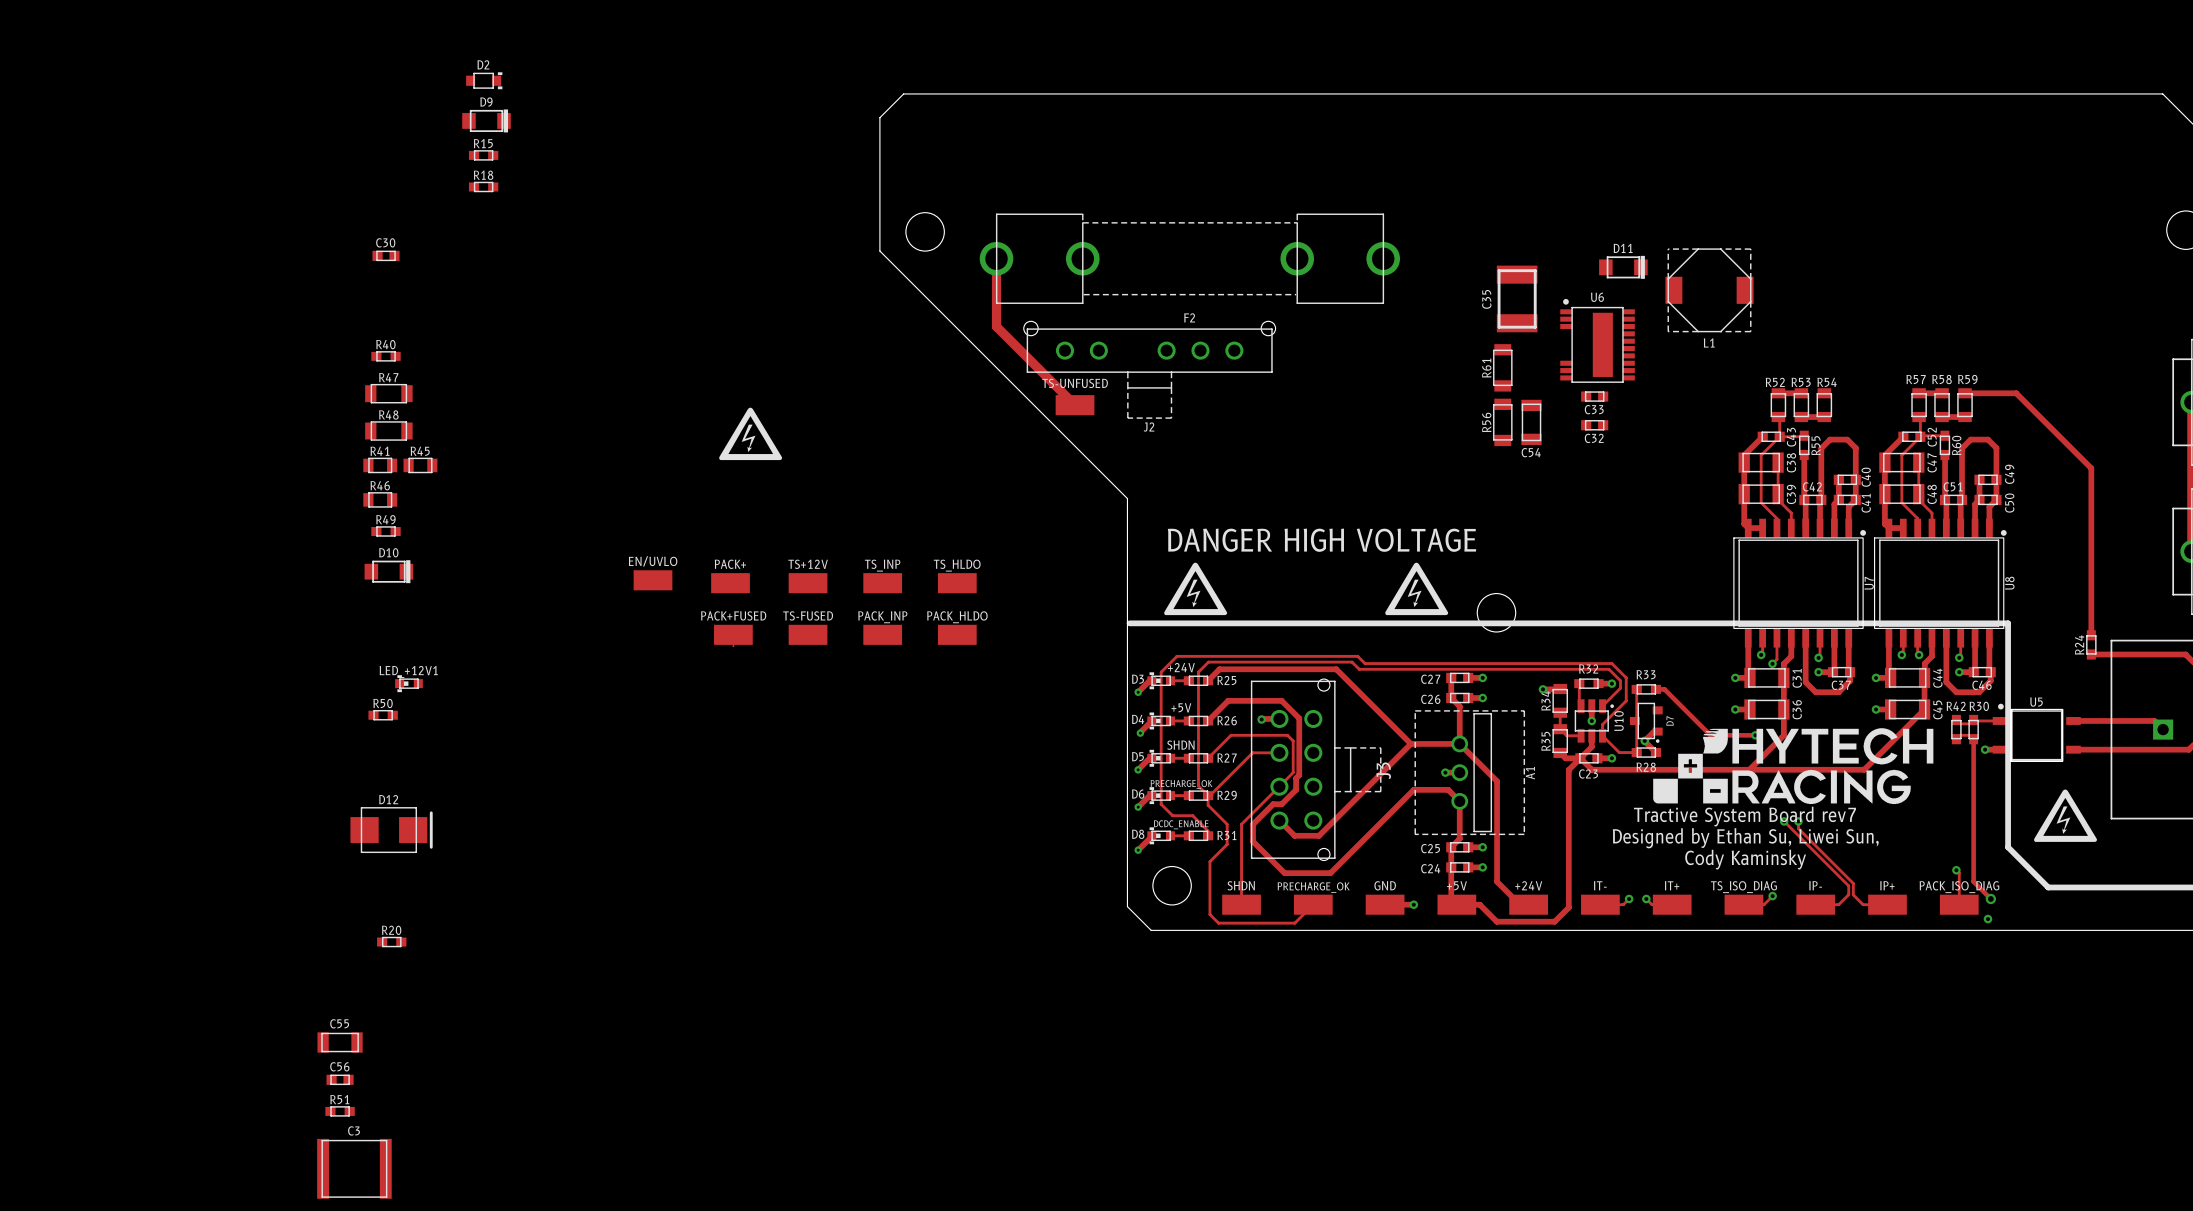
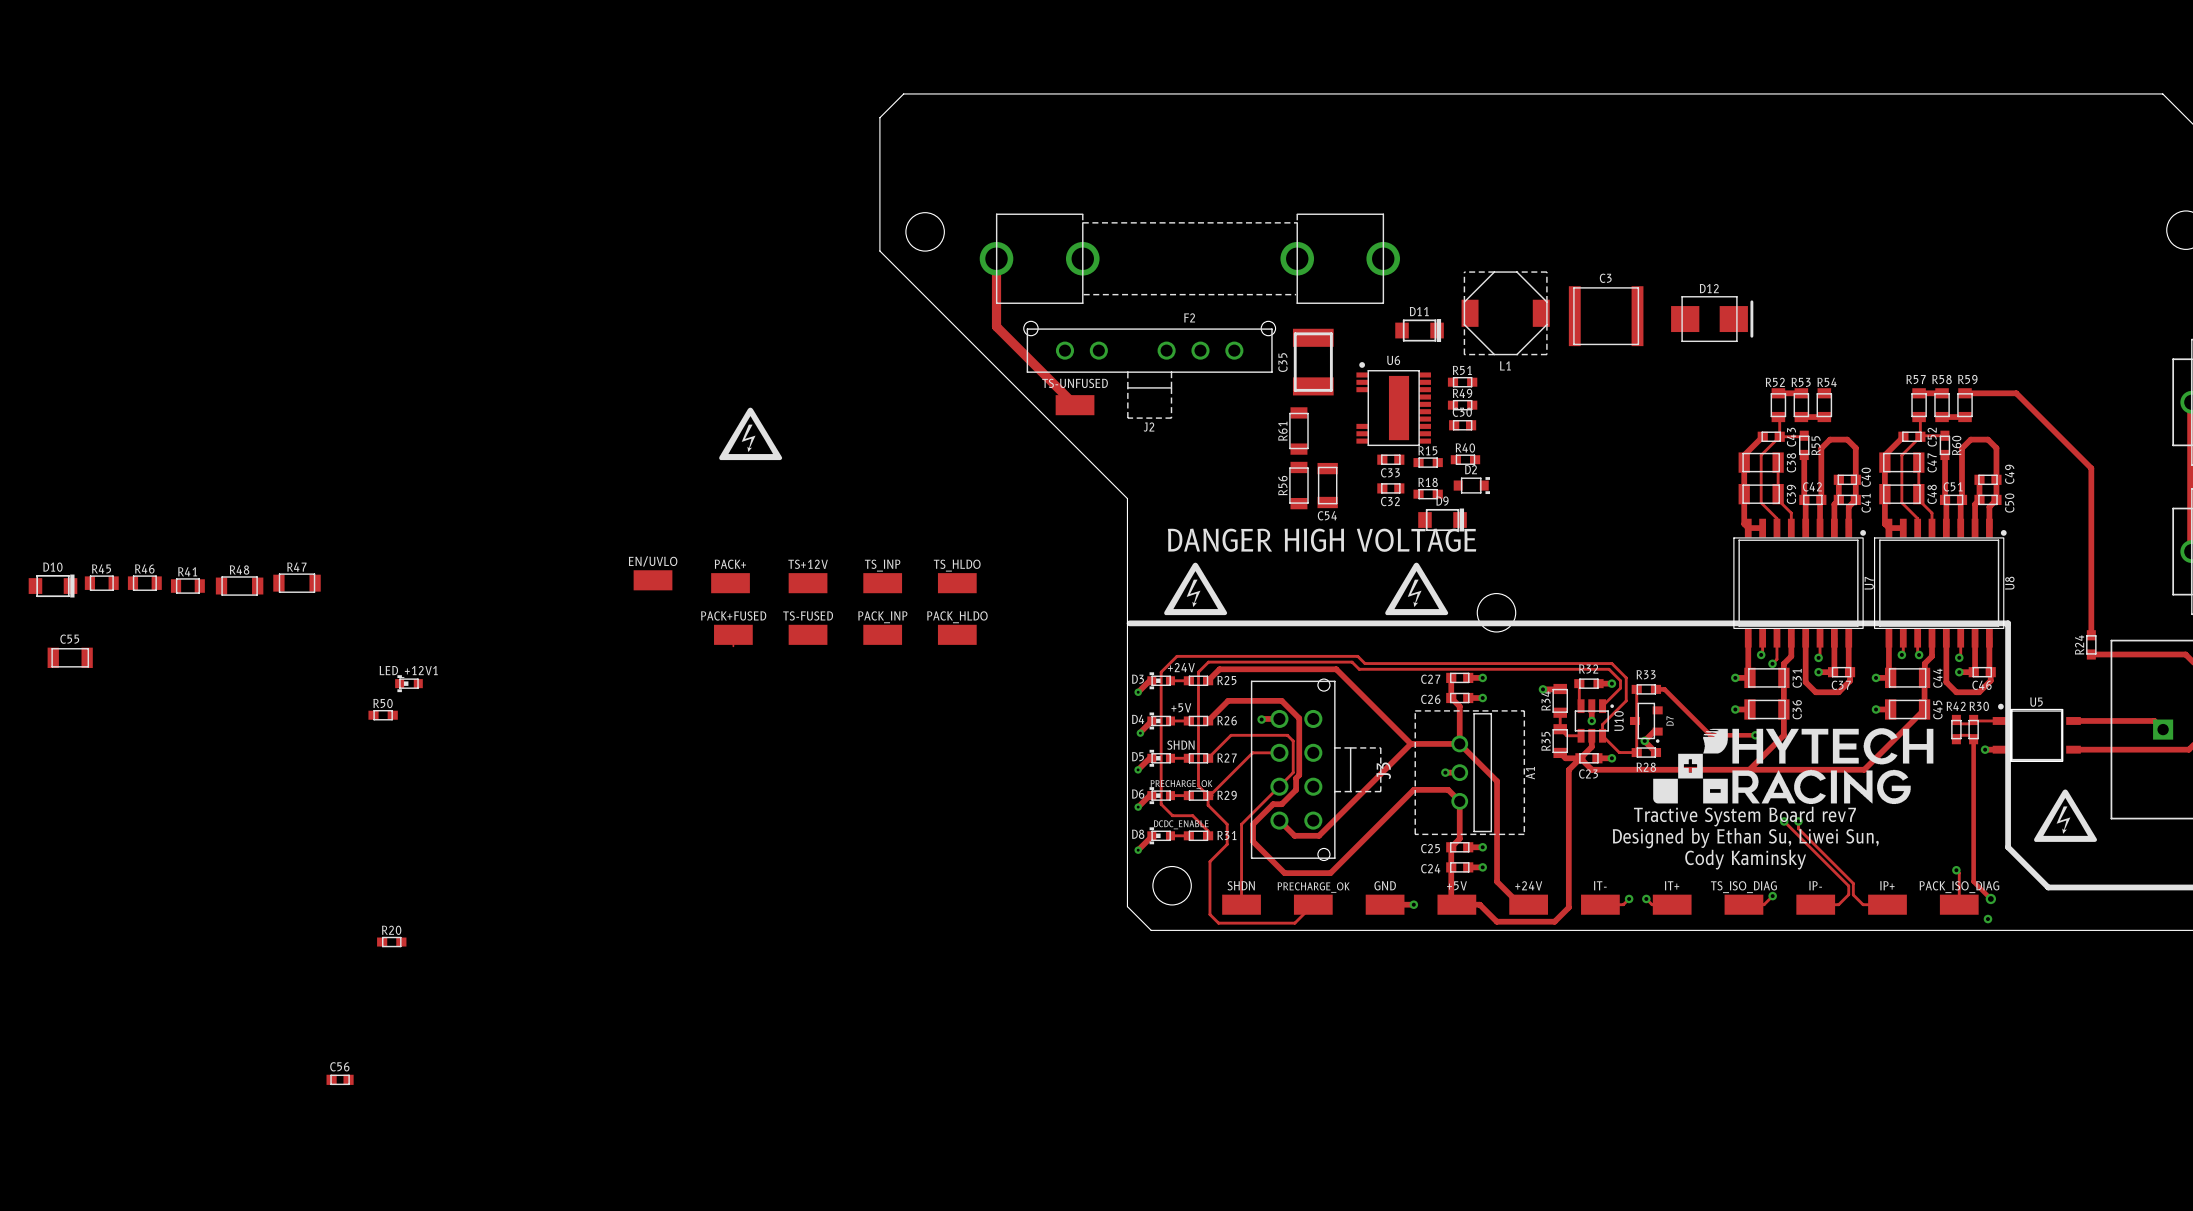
D2 position: (484, 80) -> (1471, 485)
D9 position: (486, 120) -> (1442, 520)
R15 position: (483, 155) -> (1428, 462)
R18 position: (483, 186) -> (1428, 494)
C30 position: (386, 255) -> (1462, 425)
D11 position: (1623, 267) -> (1419, 330)
L1 position: (1709, 290) -> (1505, 313)
C35 position: (1517, 298) -> (1313, 362)
U6 position: (1597, 340) -> (1393, 404)
R40 position: (386, 356) -> (1465, 459)
R61 position: (1502, 367) -> (1298, 431)
R47 position: (388, 393) -> (297, 583)
C33 position: (1594, 396) -> (1390, 459)
R56 position: (1502, 422) -> (1298, 485)
C54 position: (1531, 422) -> (1327, 485)
C32 position: (1594, 425) -> (1390, 488)
R48 position: (388, 431) -> (239, 586)
R41 position: (380, 465) -> (187, 586)
R45 position: (420, 465) -> (101, 583)
R46 position: (380, 499) -> (144, 583)
R49 position: (386, 531) -> (1462, 405)
D10 position: (388, 571) -> (52, 586)
D12 position: (391, 830) -> (1712, 319)
C55 position: (340, 1042) -> (70, 657)
R51 position: (340, 1111) -> (1462, 382)
C3 position: (354, 1168) -> (1606, 316)

